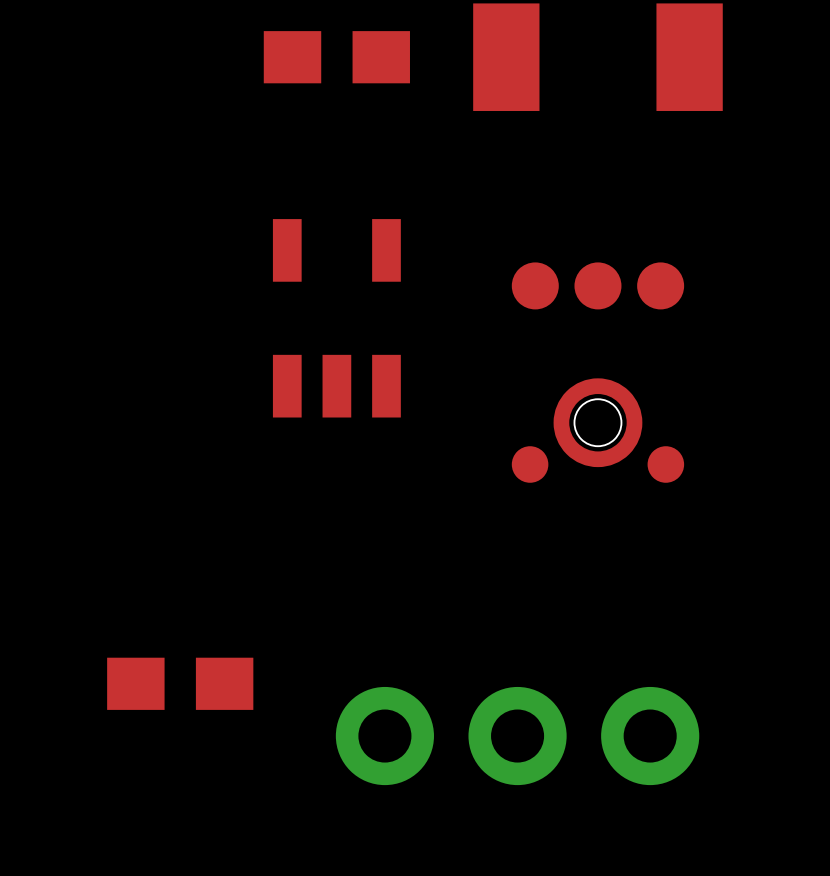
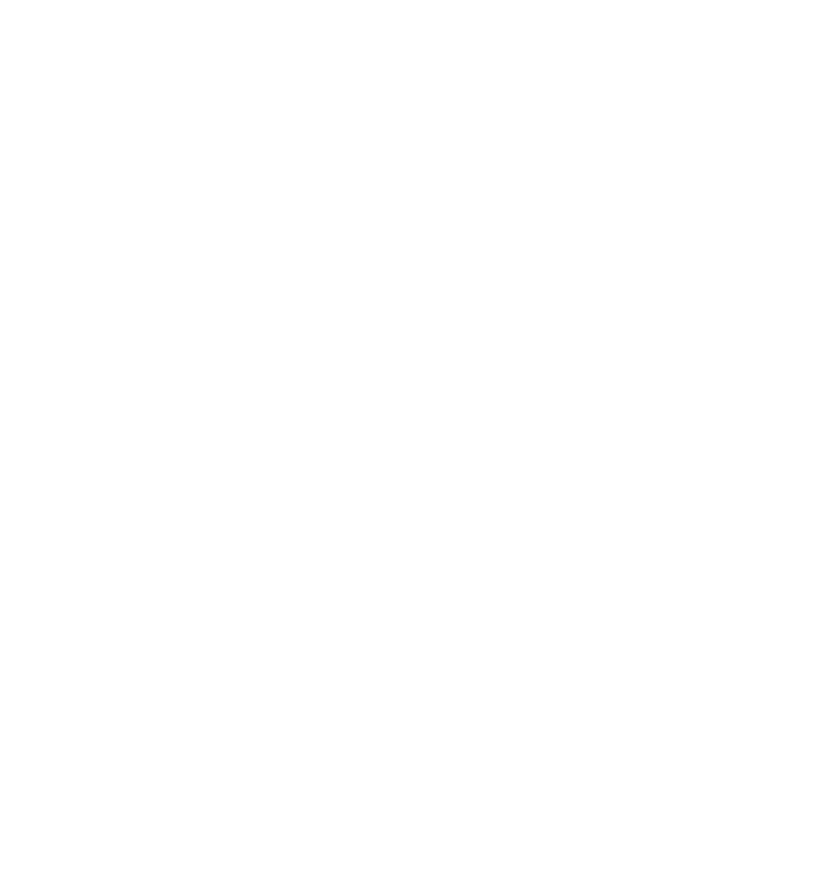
part: (336, 57) -> none
part: (597, 57) -> none
part: (336, 318) -> none
part: (597, 372) -> none
part: (180, 683) -> none
part: (517, 736) -> none

